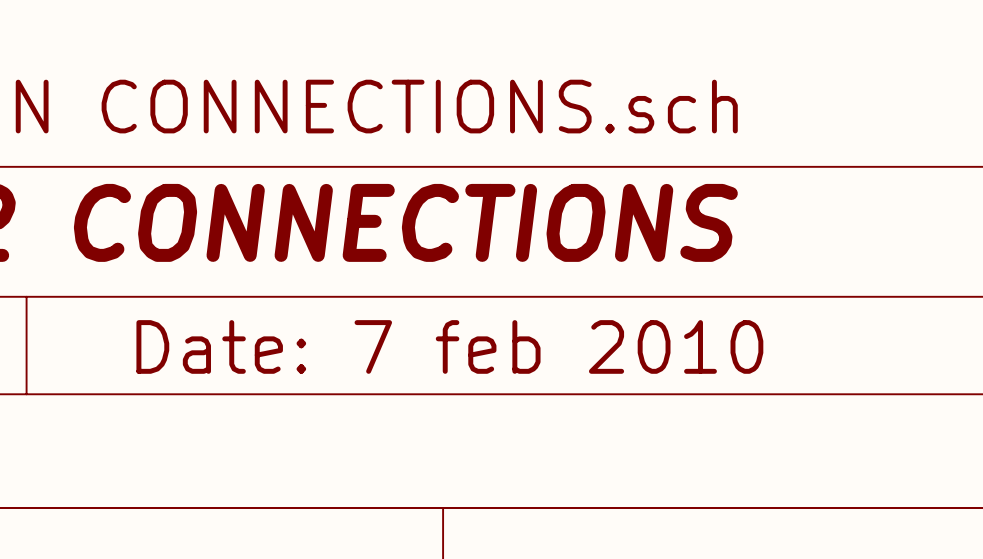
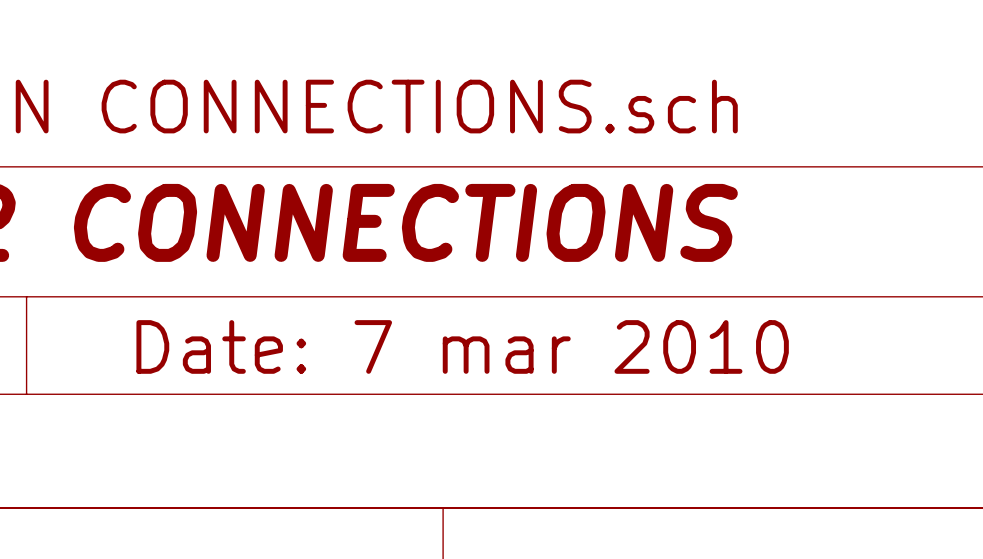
title block: Date: 7 feb 2010 (449, 346) -> Date: 7 mar 2010 (462, 346)

